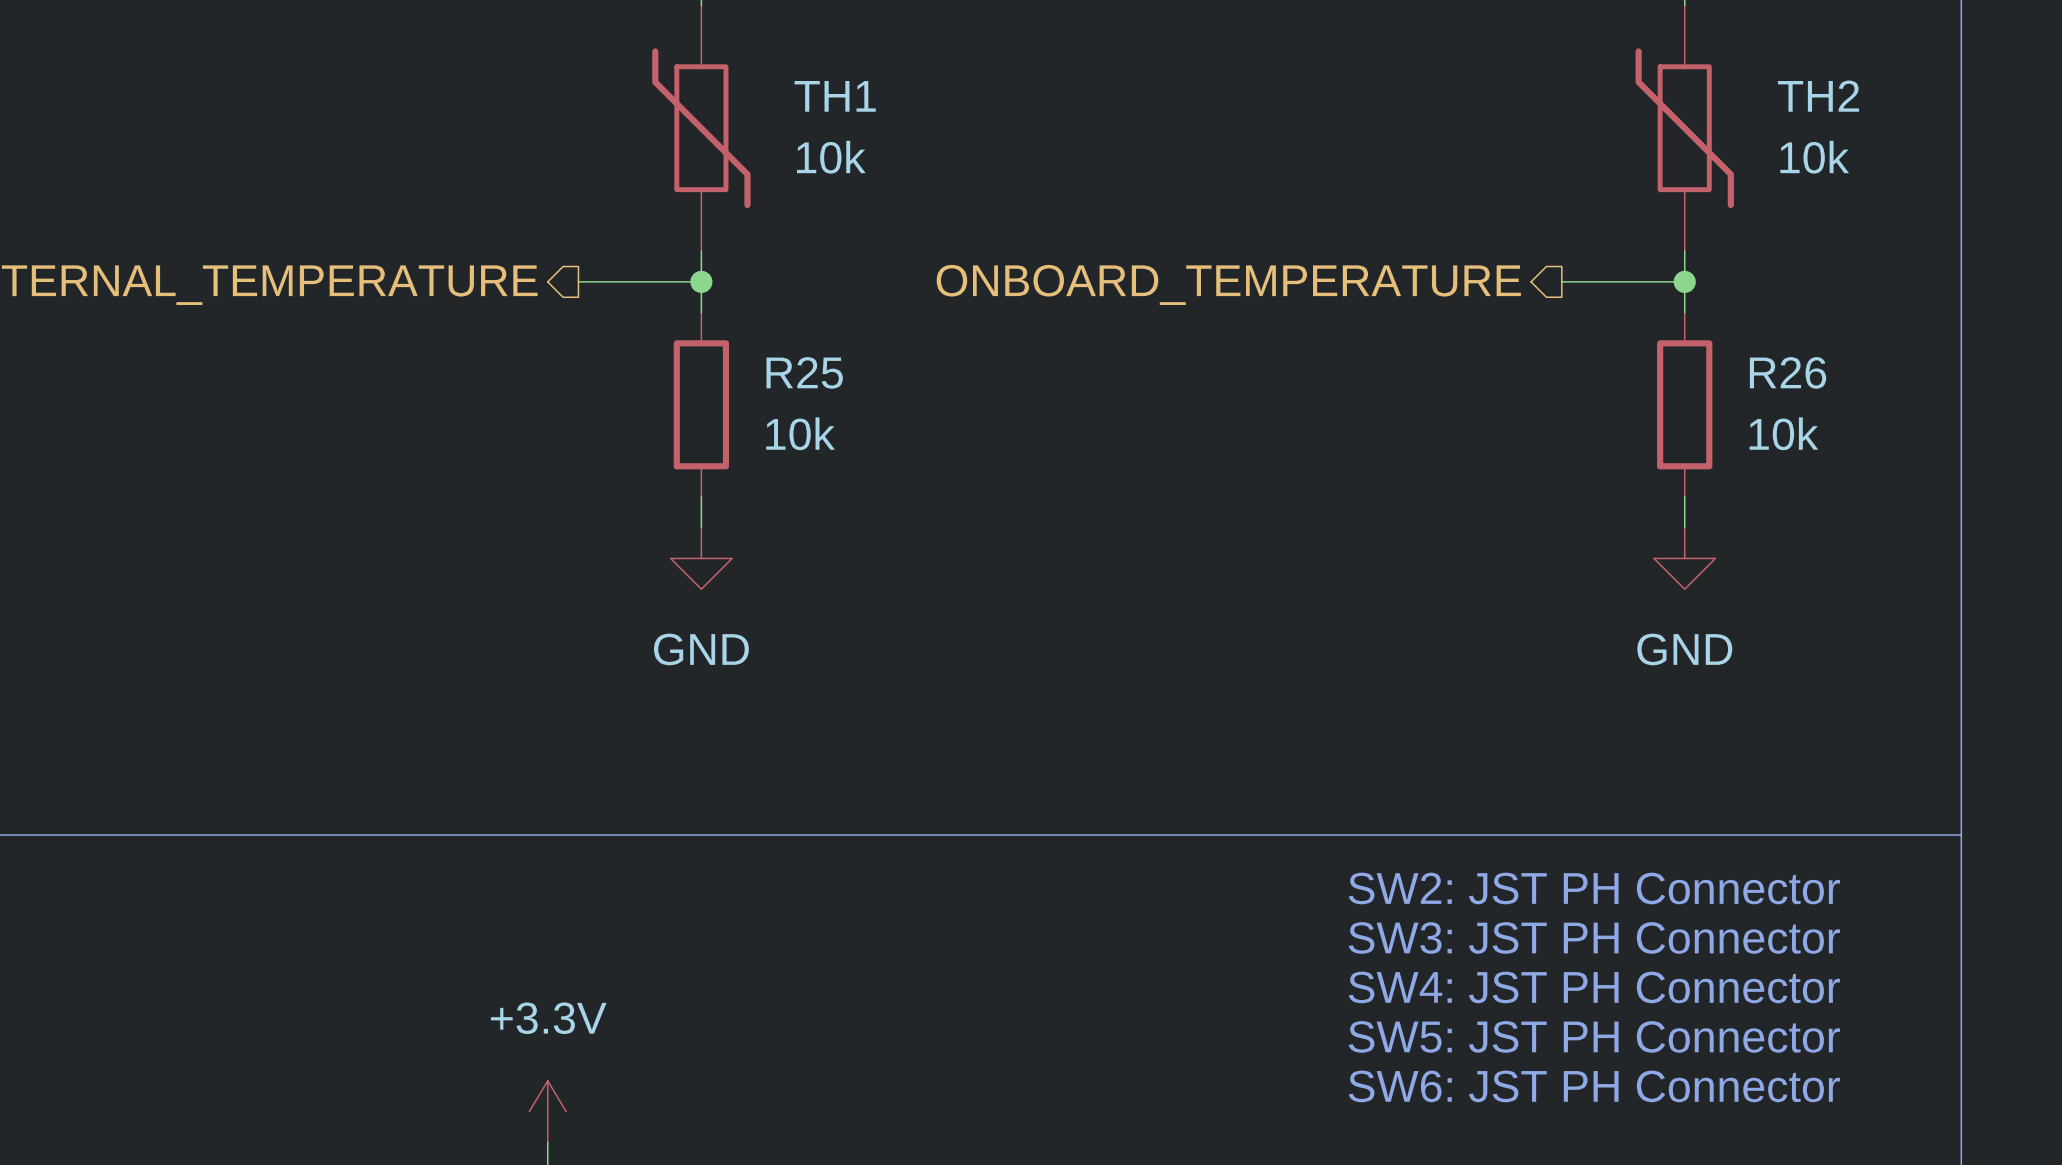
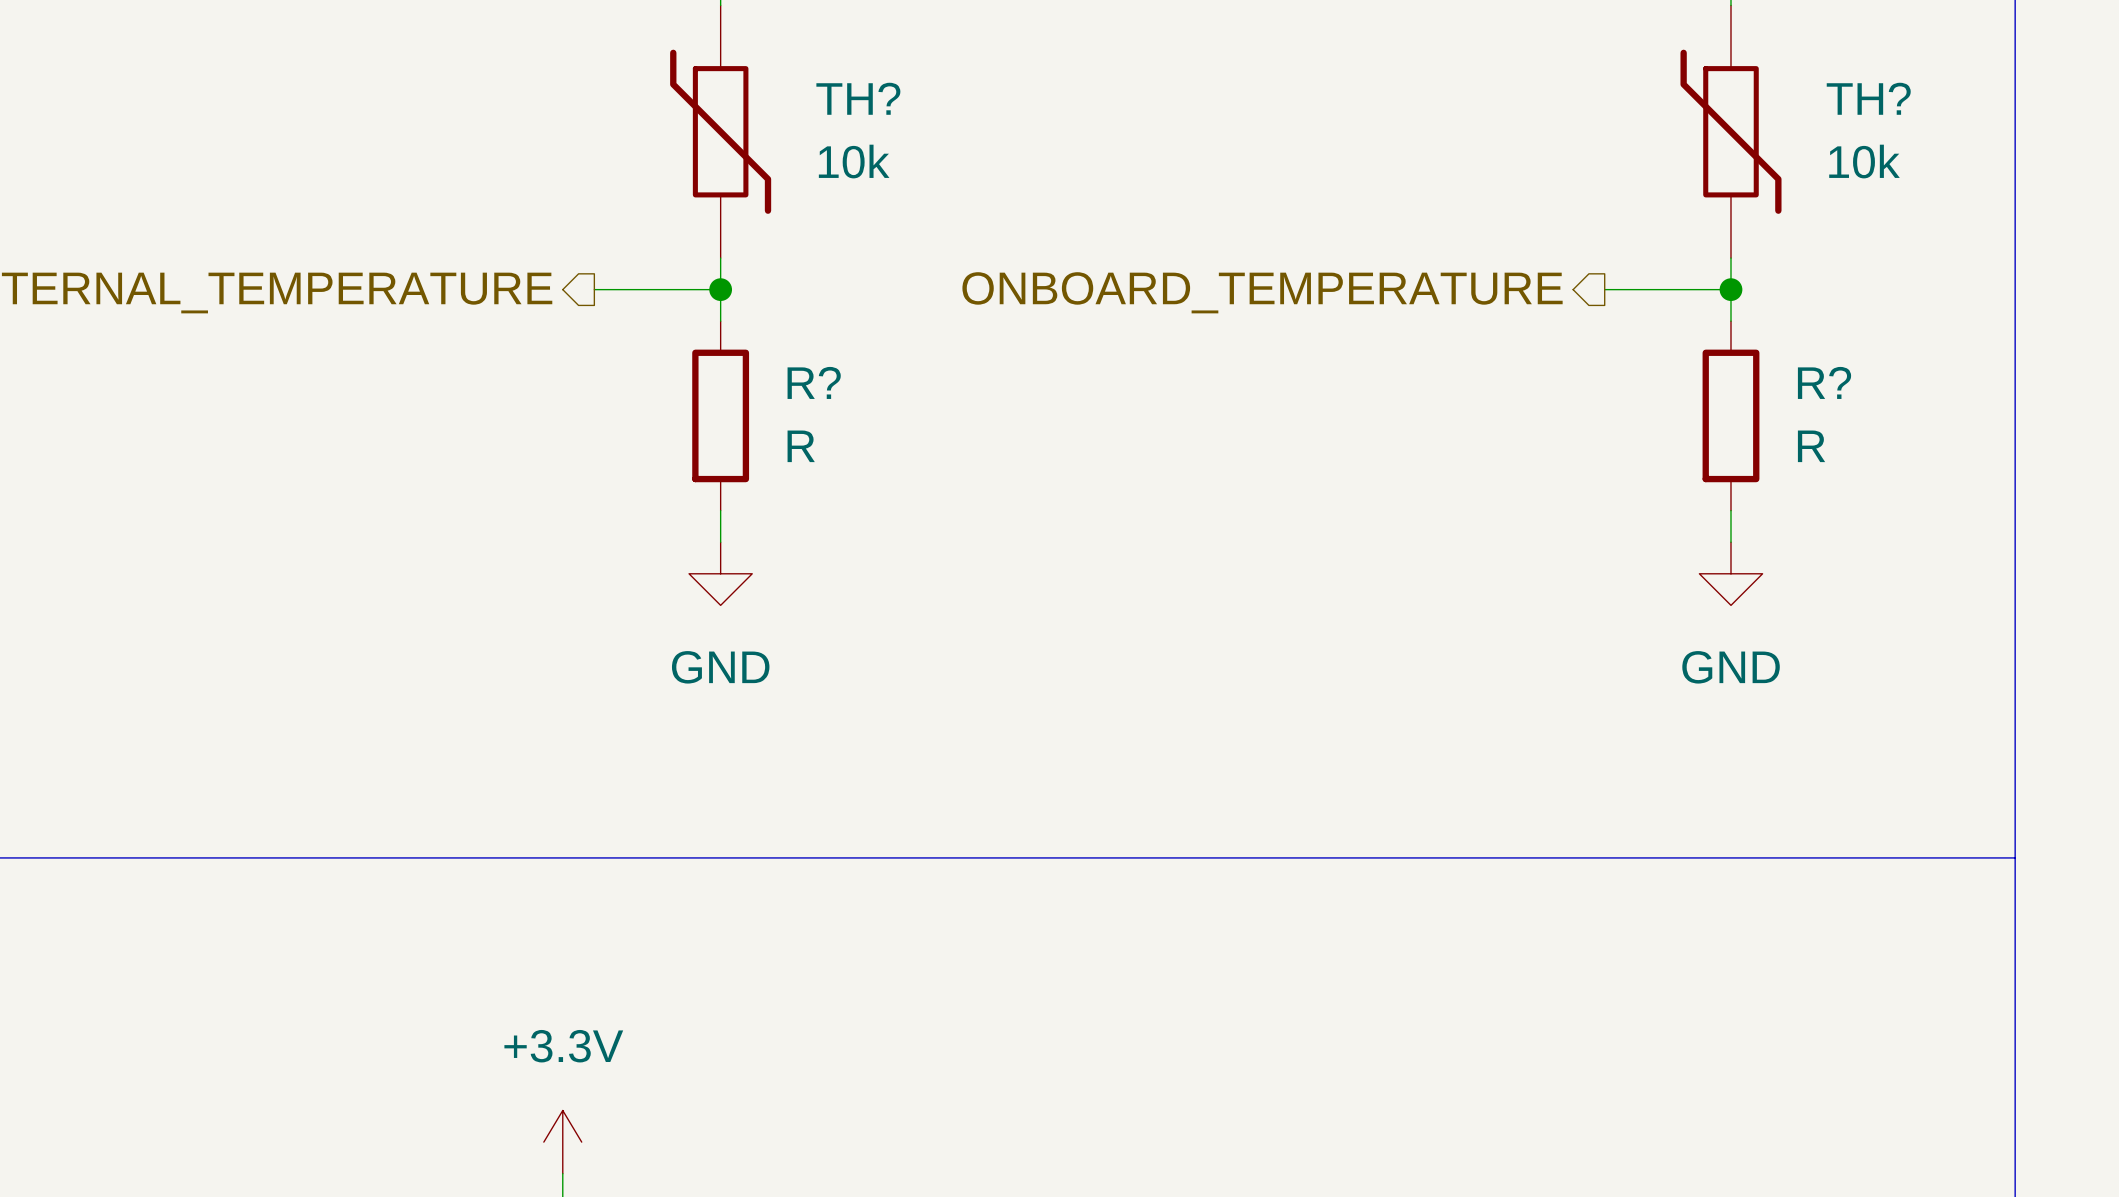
TH1 name: TH1 (835, 96) -> TH? (858, 98)
TH2 name: TH2 (1818, 96) -> TH? (1868, 98)
R25 name: R25 (804, 372) -> R? (814, 382)
R26 name: R26 (1788, 372) -> R? (1824, 382)
R25 value: 10k (800, 433) -> R (801, 446)
R26 value: 10k (1783, 433) -> R (1811, 446)
text: SW2: JST PH Connector (1594, 888) -> none
text: SW3: JST PH Connector (1594, 937) -> none
text: SW4: JST PH Connector (1594, 987) -> none
text: SW5: JST PH Connector (1594, 1036) -> none
text: SW6: JST PH Connector (1594, 1086) -> none

